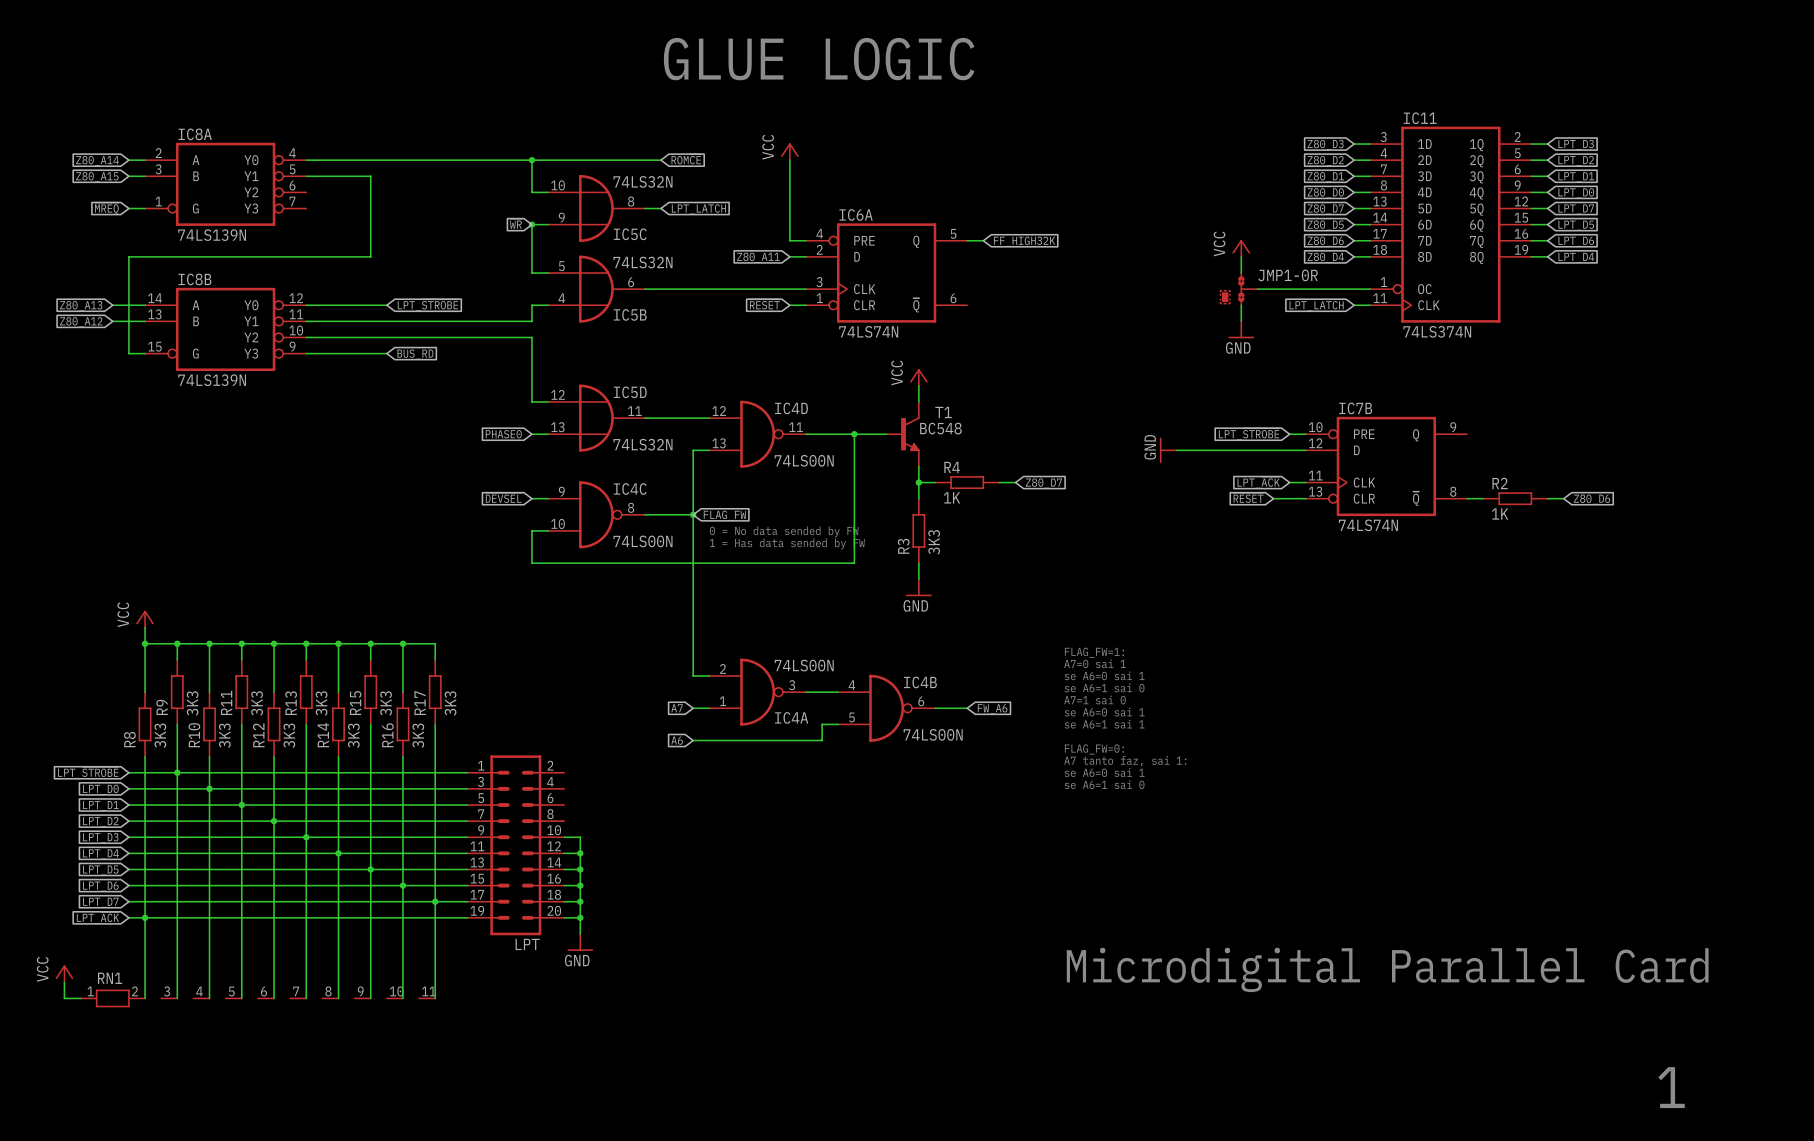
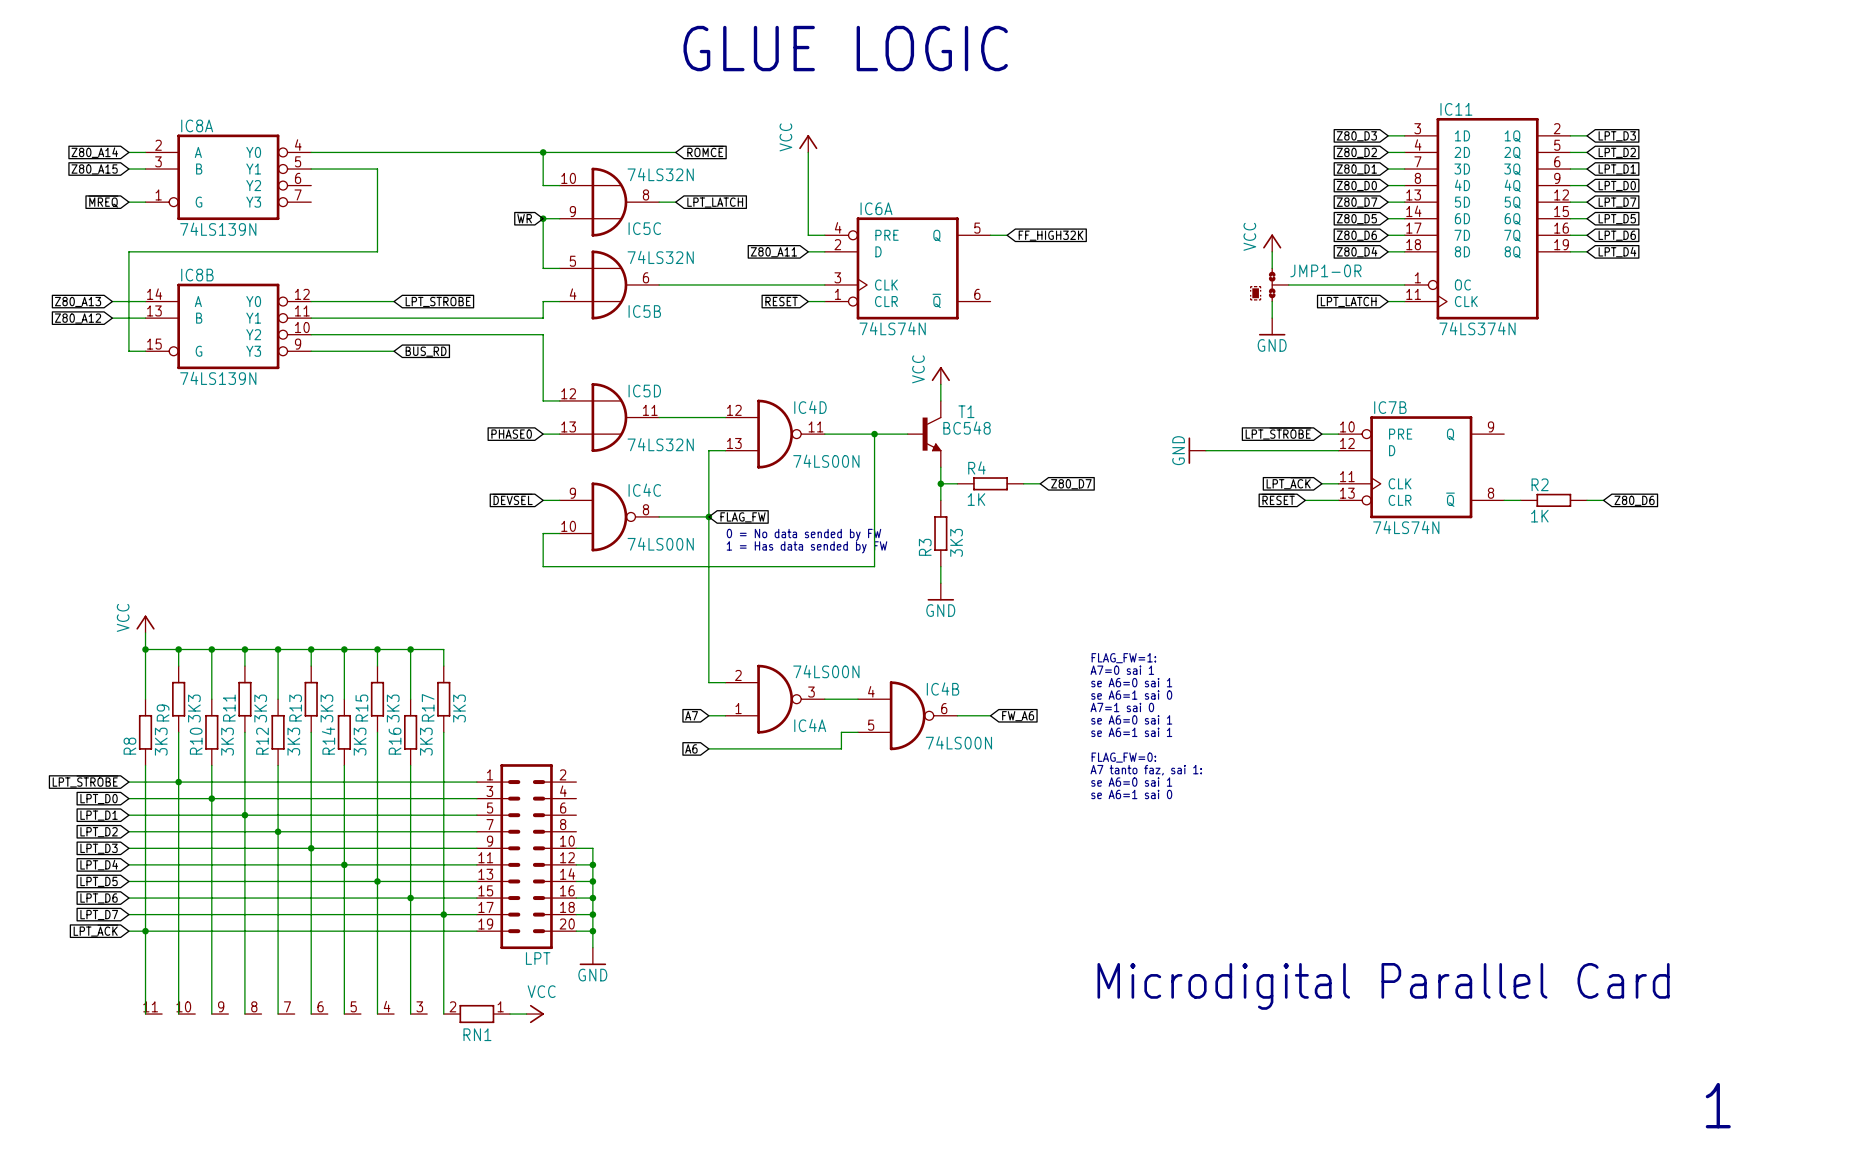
power symbol: VCC (64, 973) -> none
wire: (64, 982) (64, 998) (80, 998) -> none
RN1 rotation: 0° (112, 998) -> 180° (476, 1014)
wire: none -> (510, 1014) (526, 1014)
power symbol: none -> VCC (535, 1014)

